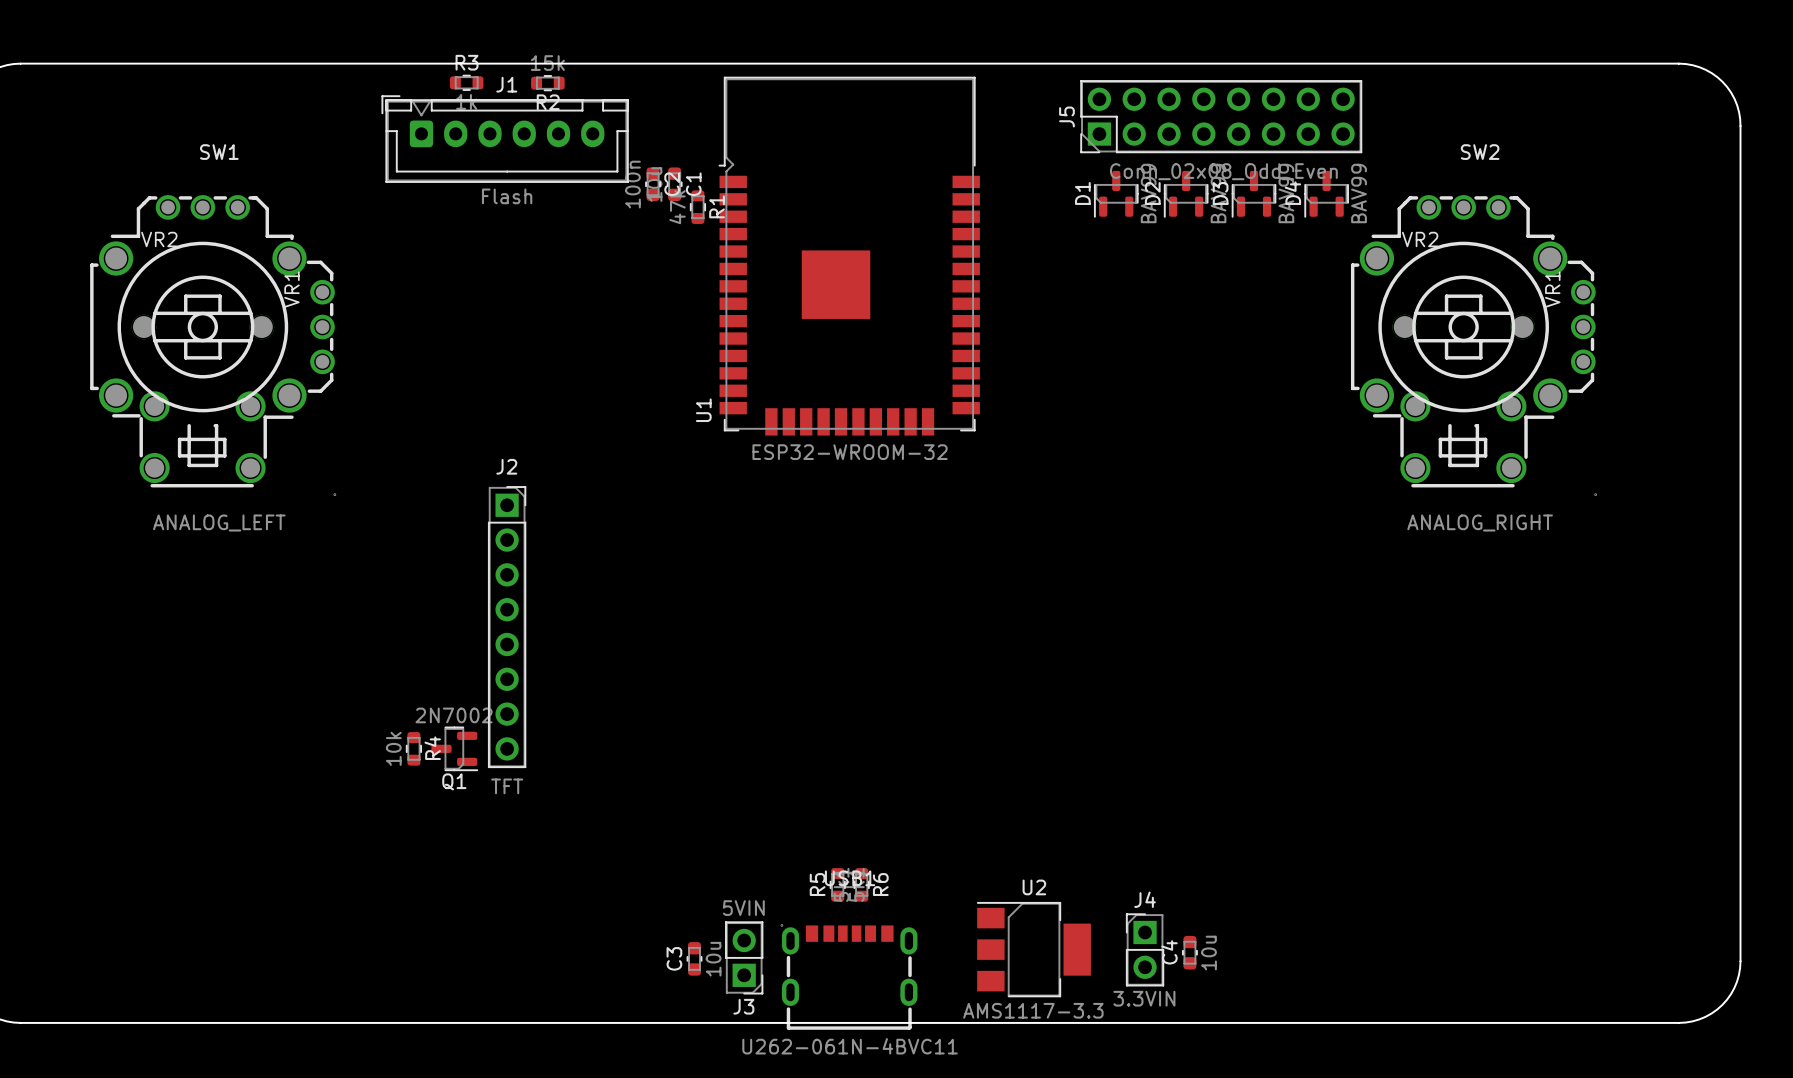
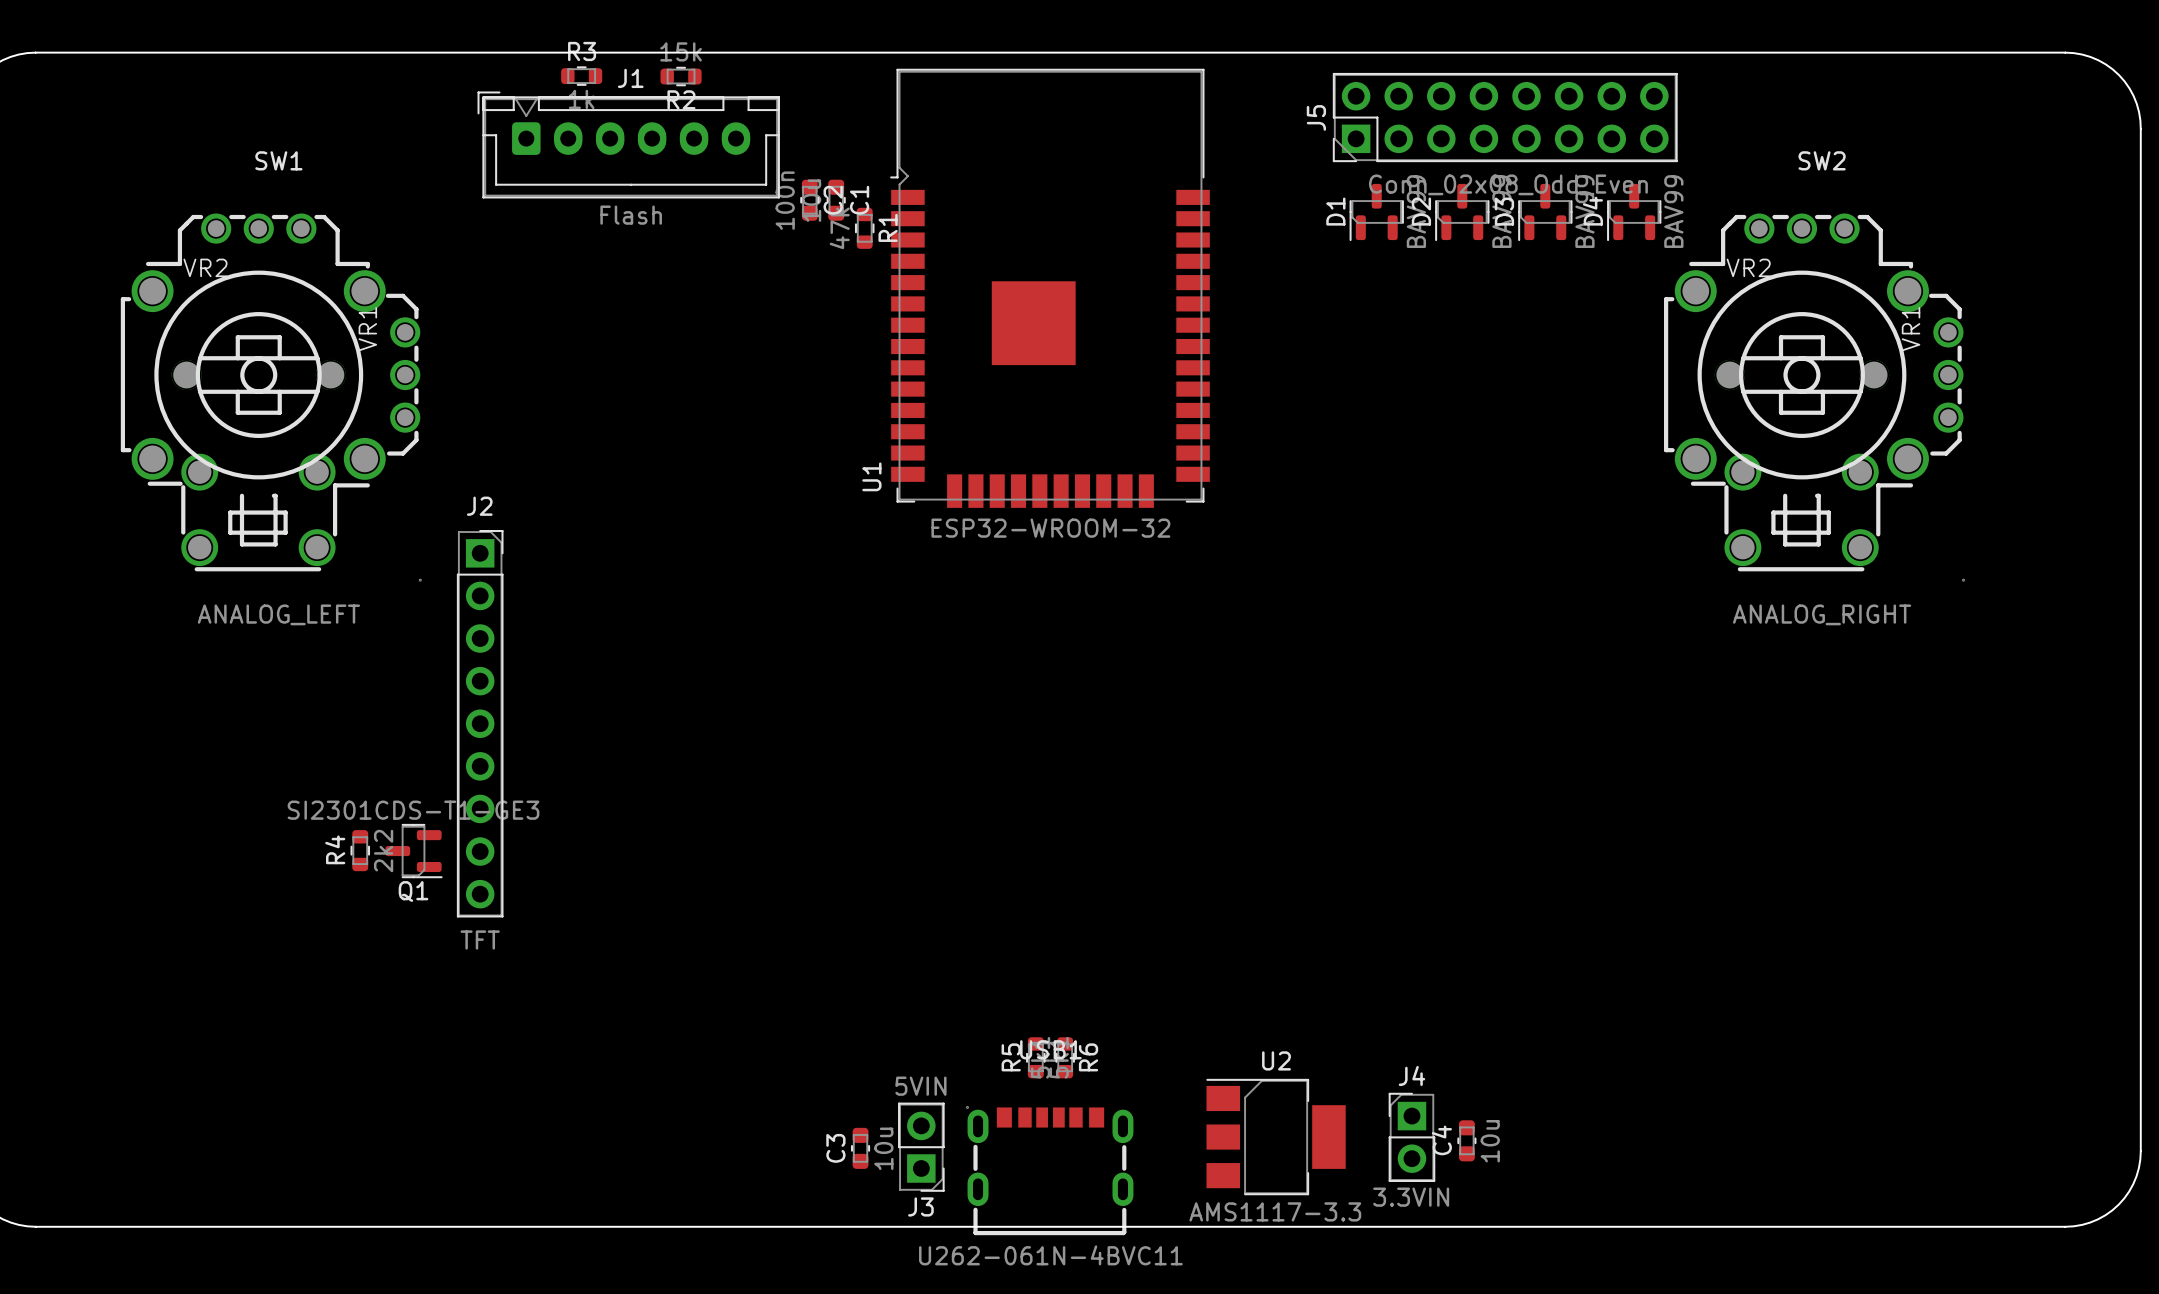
J2 footprint: [488, 486, 527, 768] -> [456, 530, 504, 918]
Q1 value: 2N7002 (454, 715) -> SI2301CDS-T1-GE3 (413, 810)
R4 value: 10k (393, 748) -> 2k2 (383, 851)
R4 position: (413, 748) -> (360, 850)
R4 name position: R4 (432, 748) -> R4 (335, 849)
Q1 position: (454, 748) -> (414, 851)

